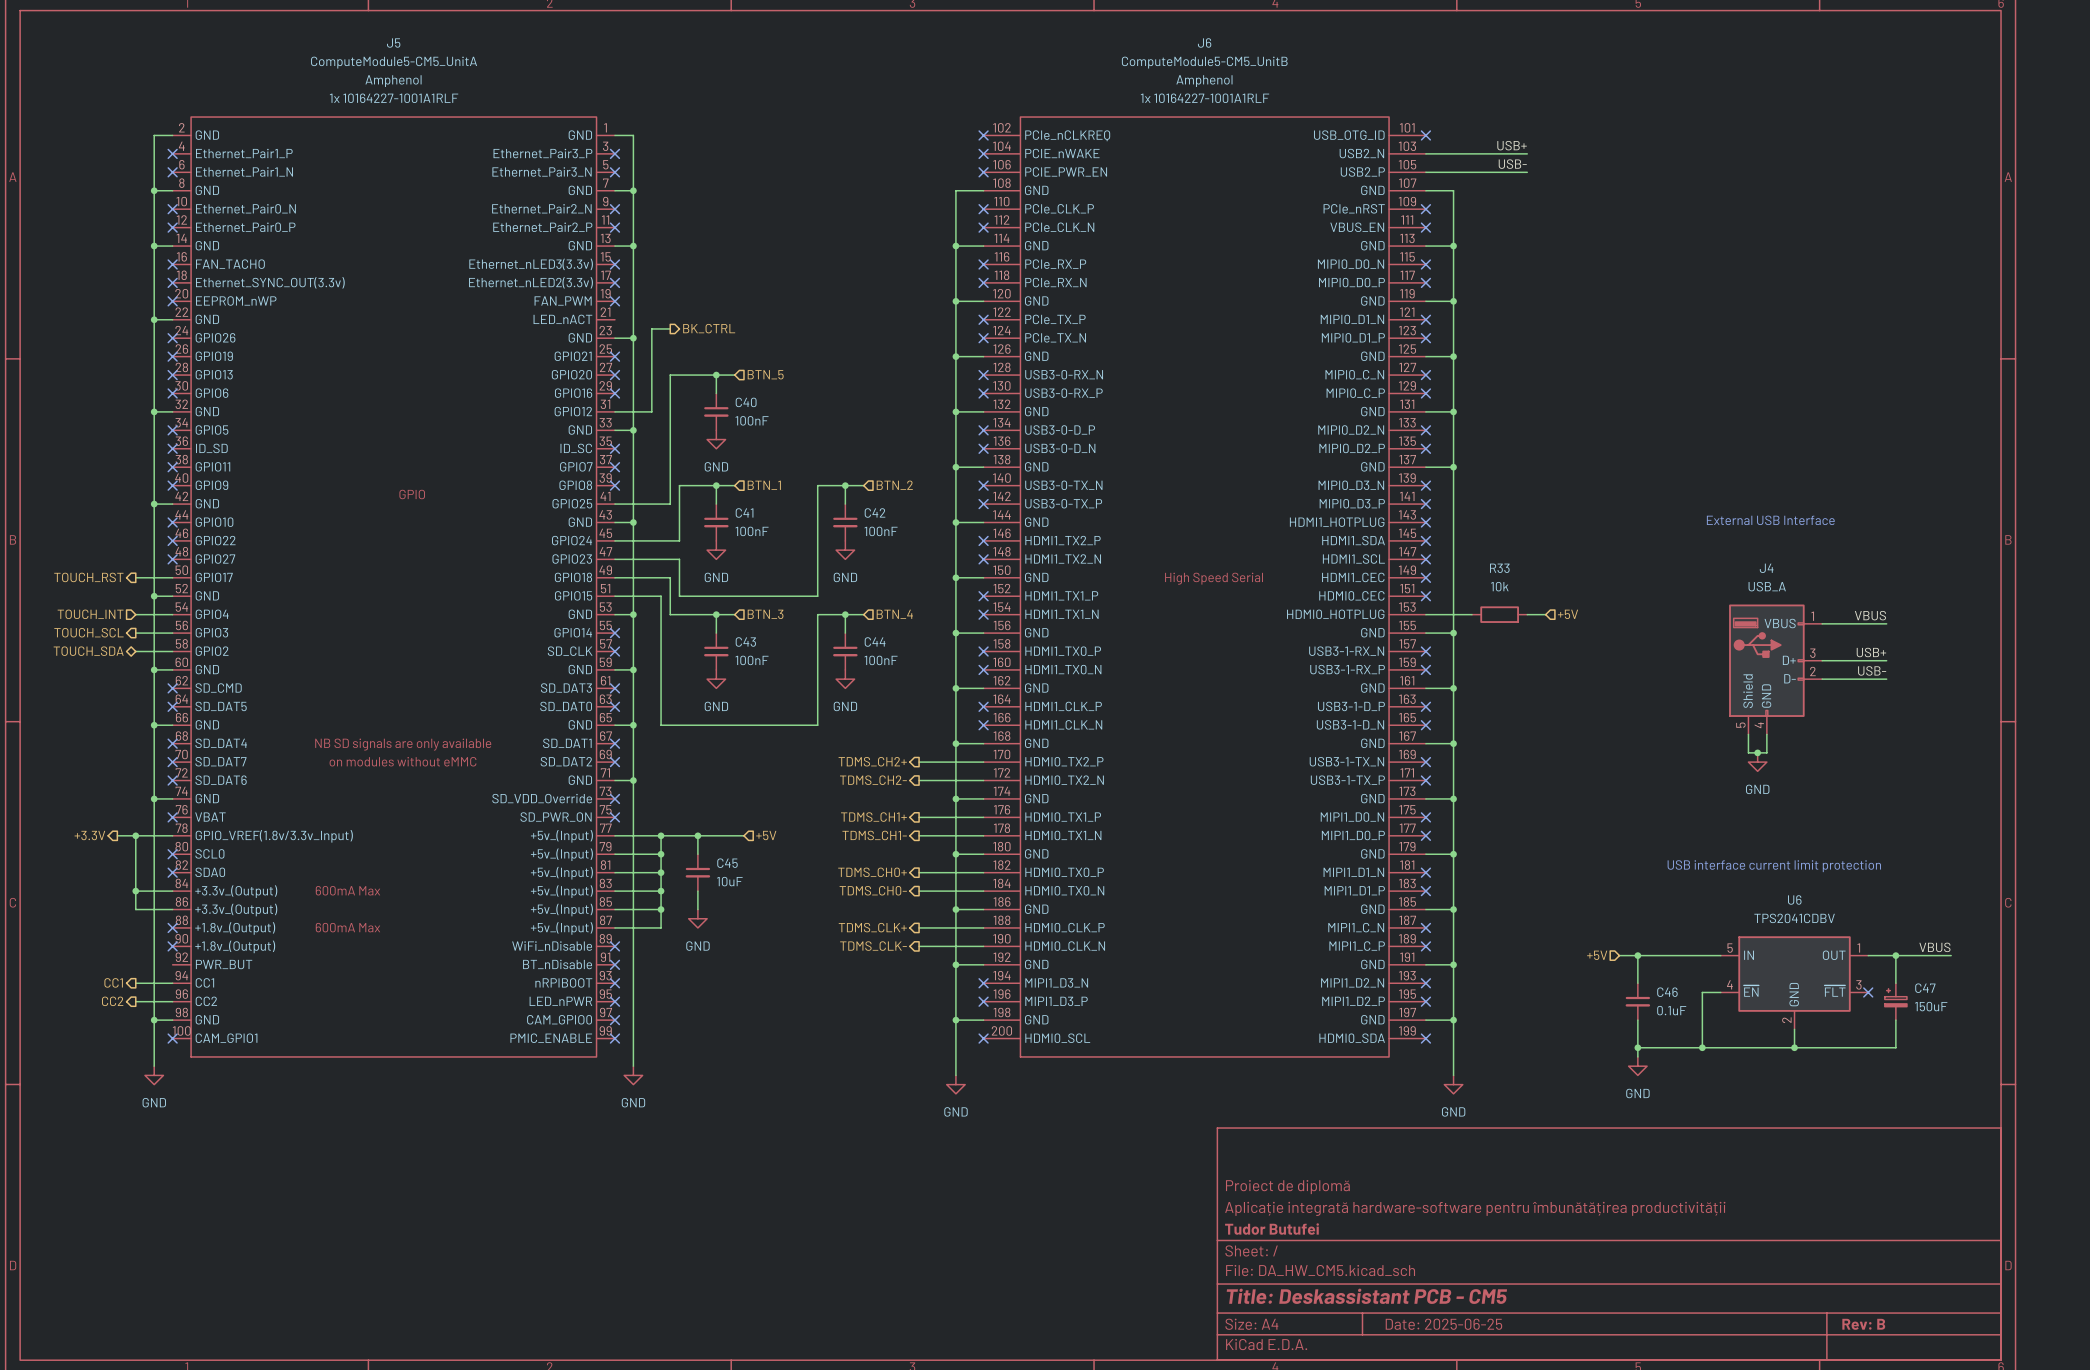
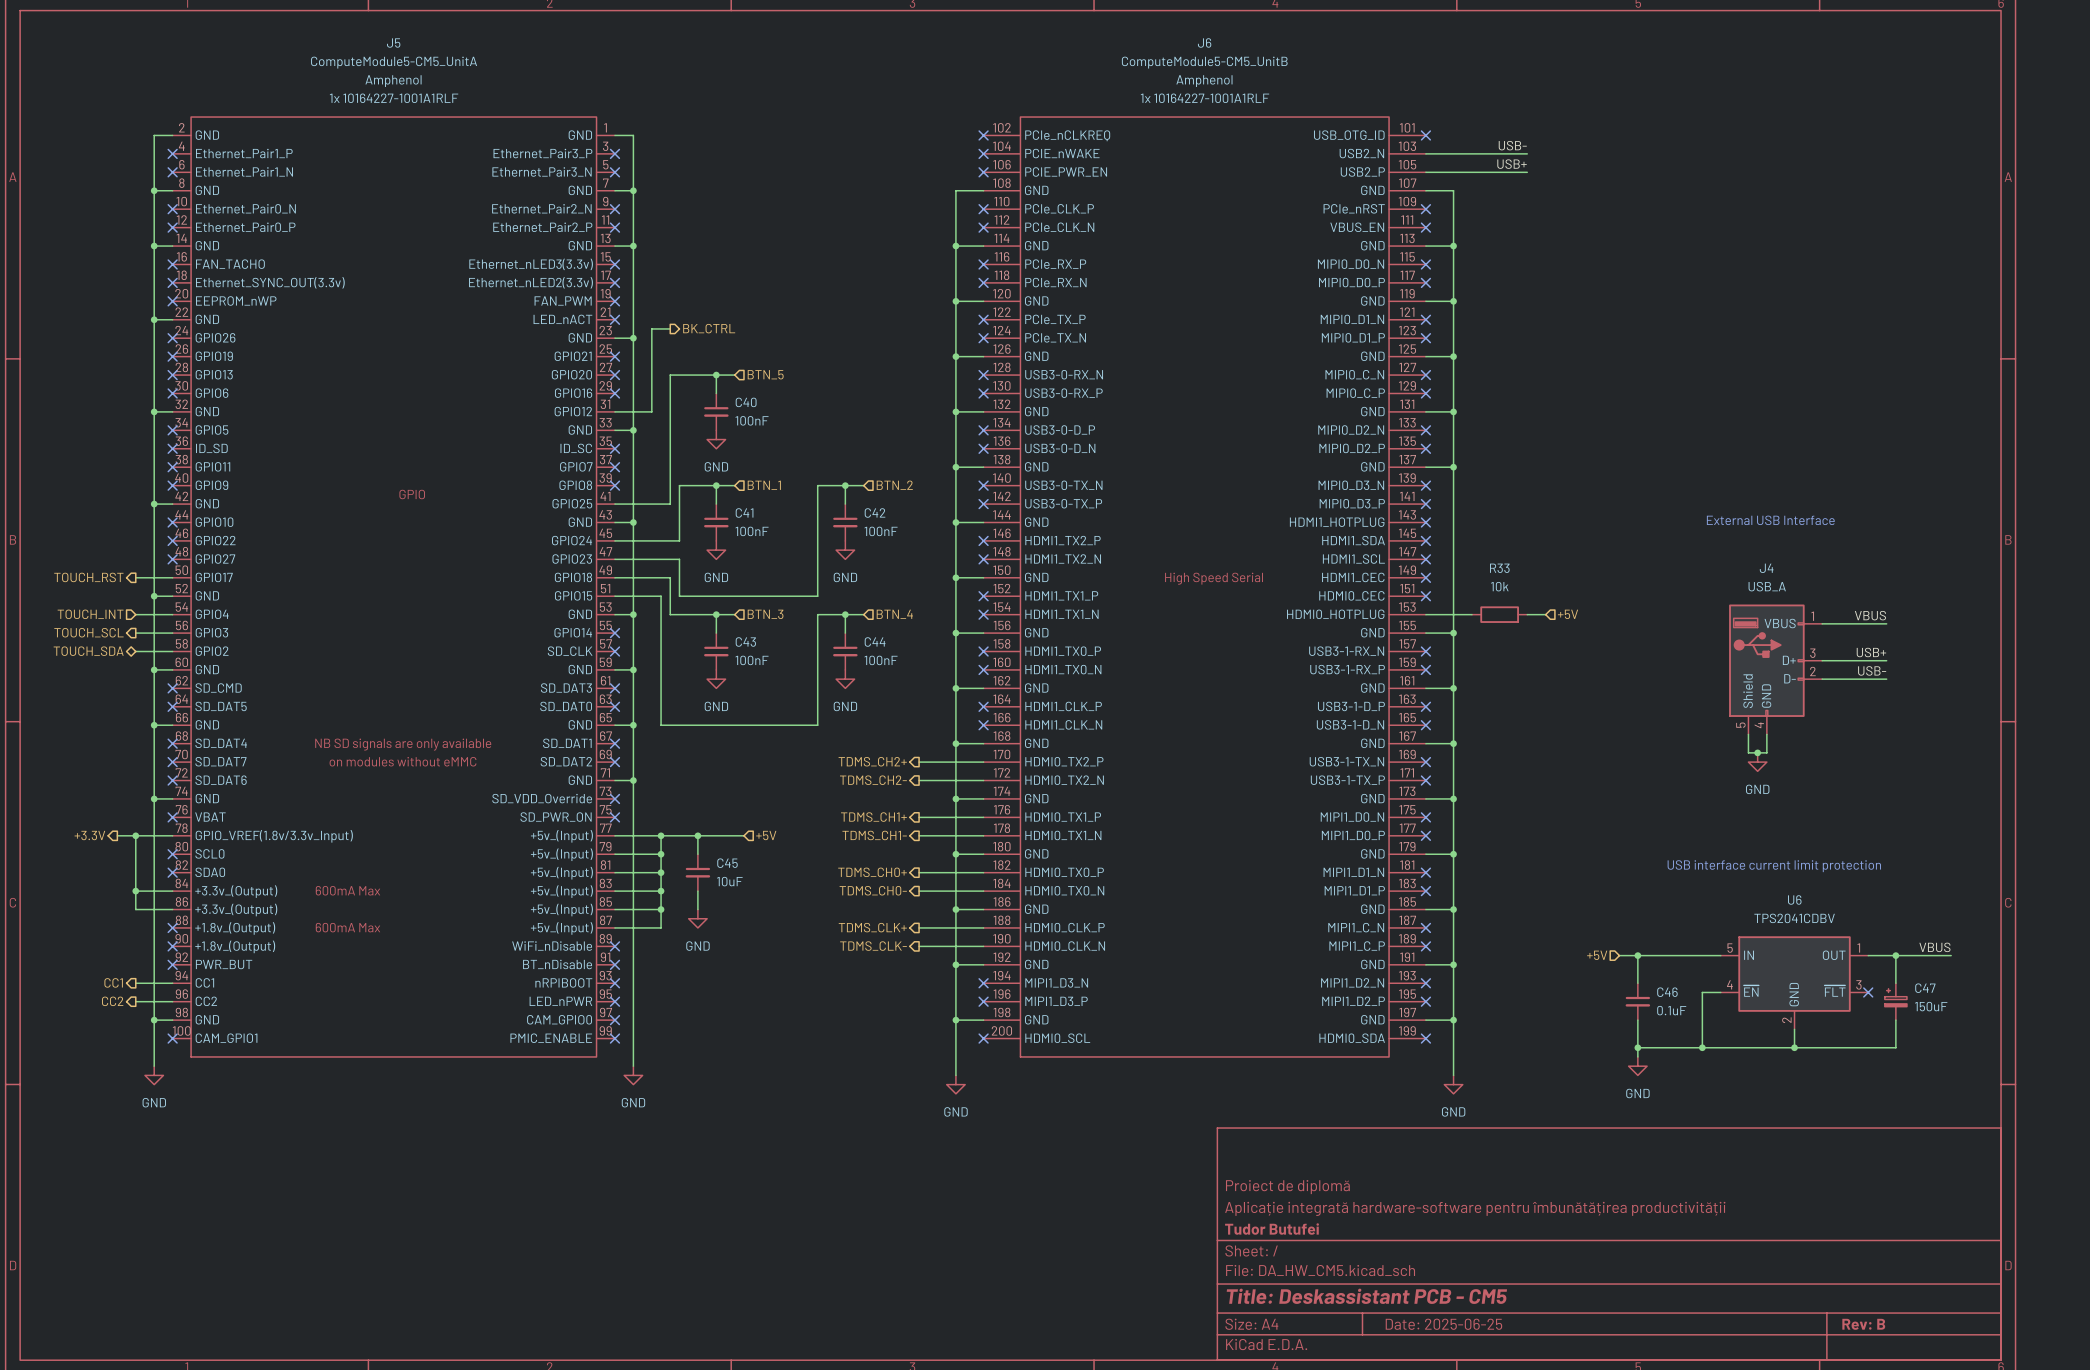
label: USB+ (1512, 145) -> USB- (1512, 145)
label: USB- (1512, 164) -> USB+ (1512, 164)
no-connect mark: none -> (614, 319)
no-connect mark: none -> (172, 964)

